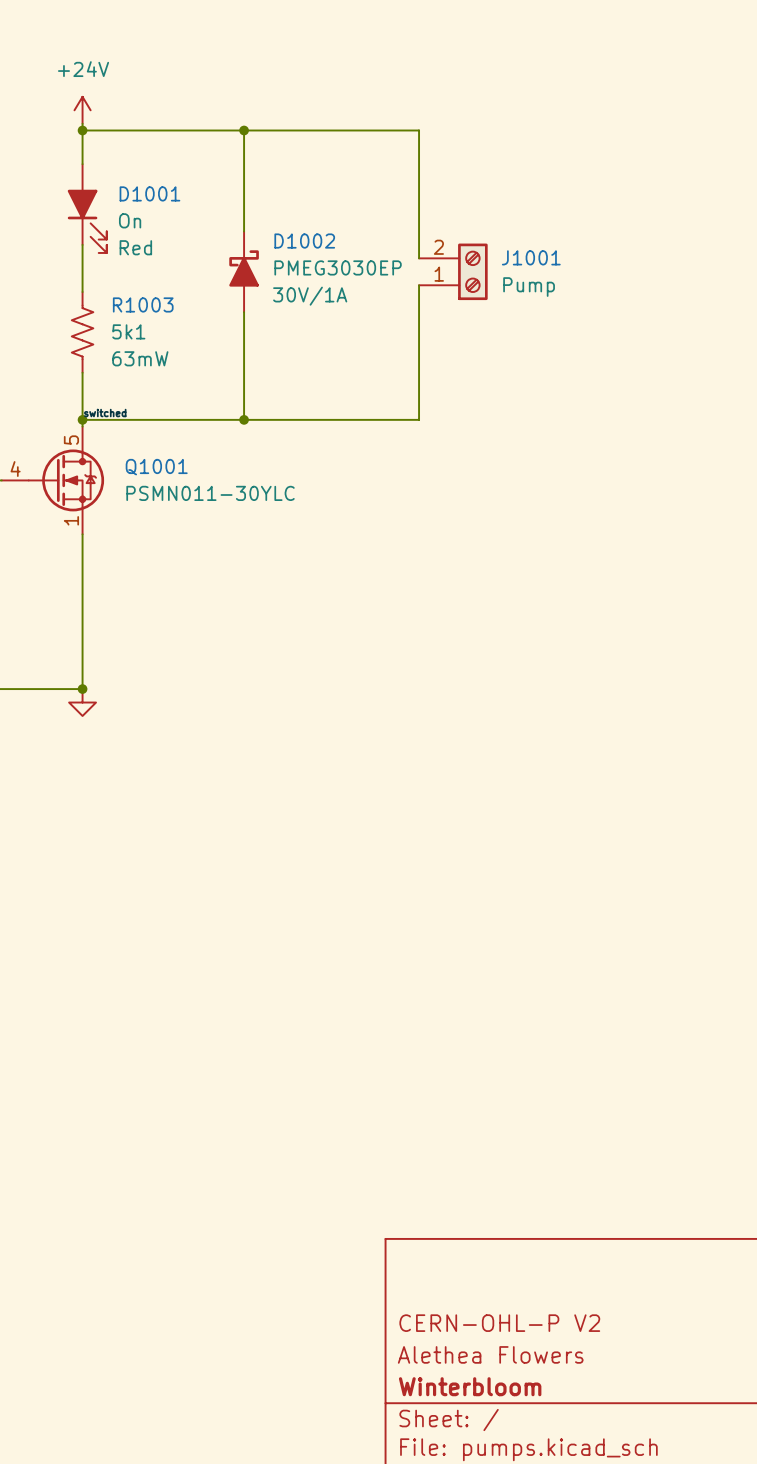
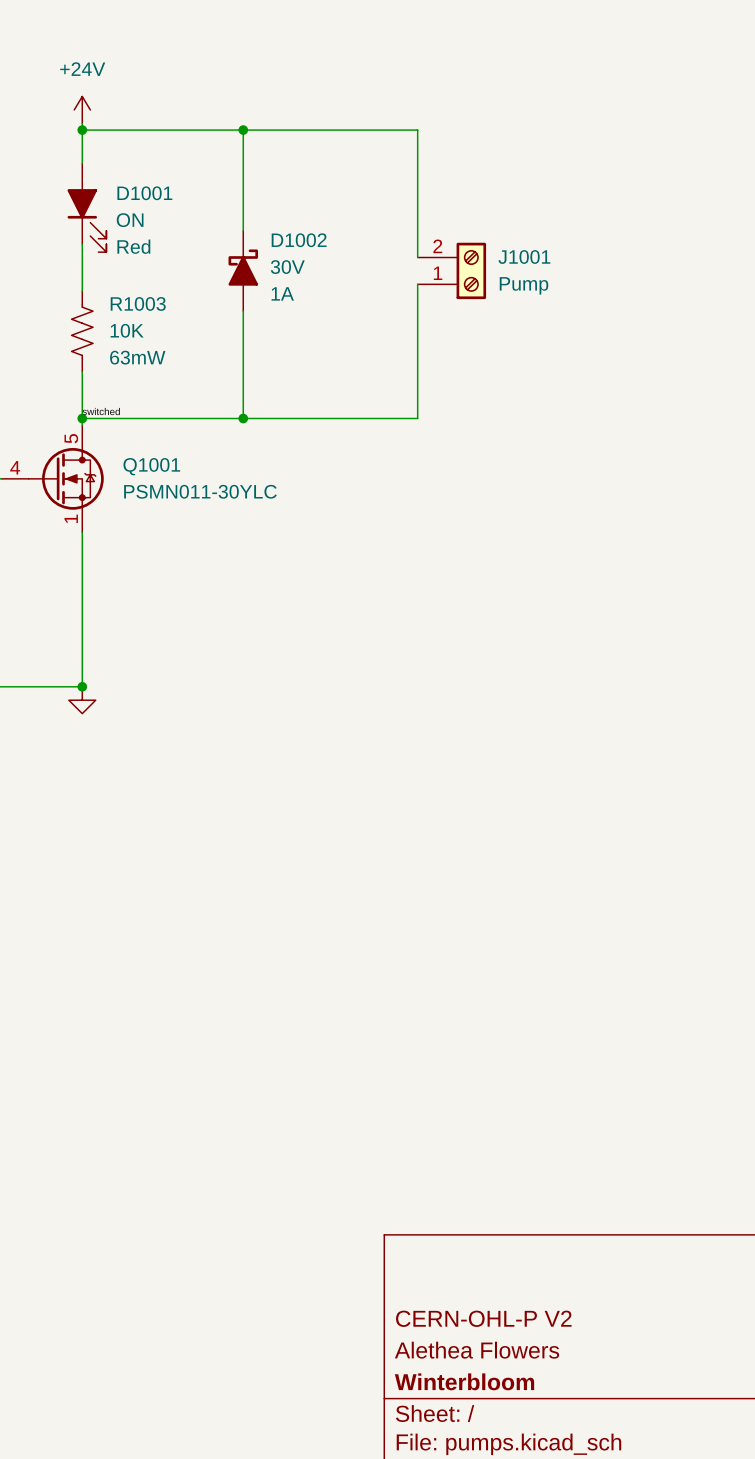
D1001 value: On (130, 220) -> ON (130, 220)
D1002 value: PMEG3030EP (338, 267) -> 30V (287, 267)
D1002 text: 30V/1A (310, 296) -> 1A (282, 293)
R1003 value: 5k1 (128, 331) -> 10K (127, 330)

